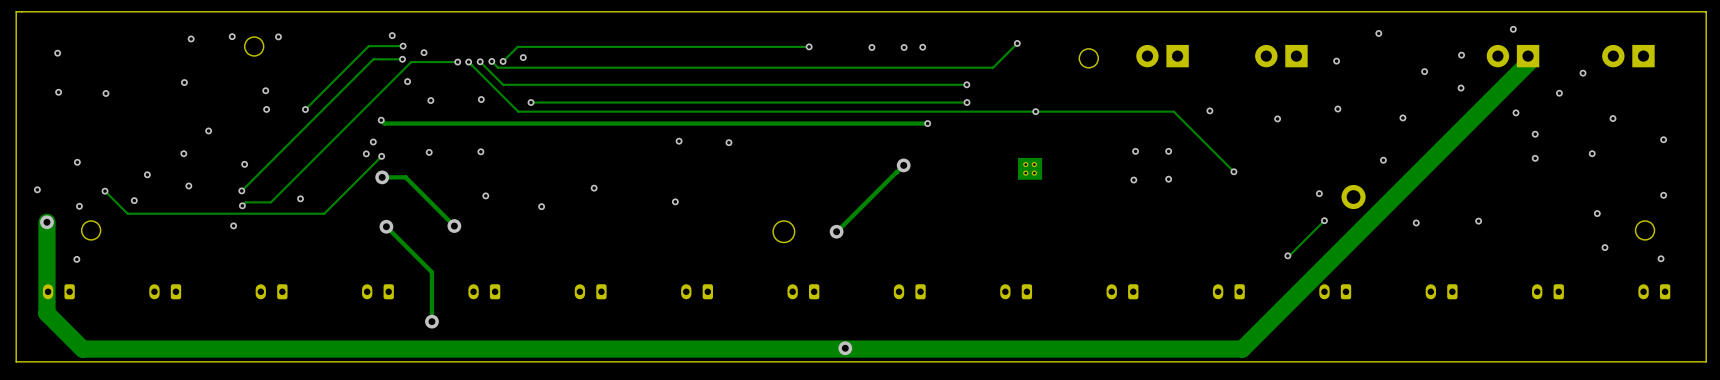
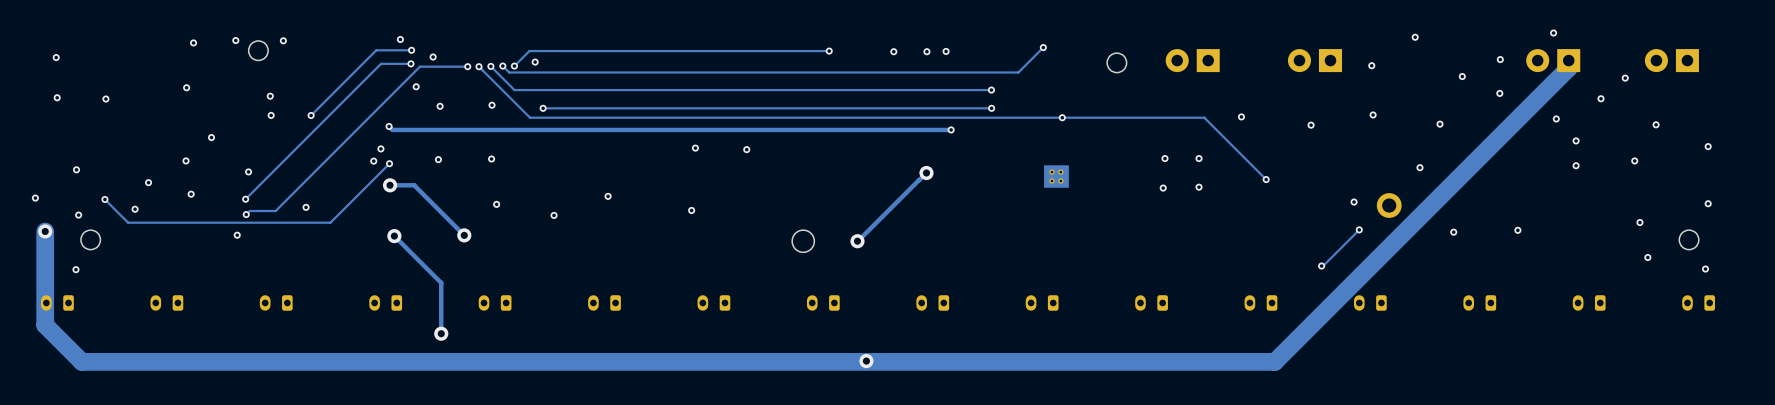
board edge: (1706, 11) (16, 11) (16, 361) (1706, 361) (1706, 11) -> none

